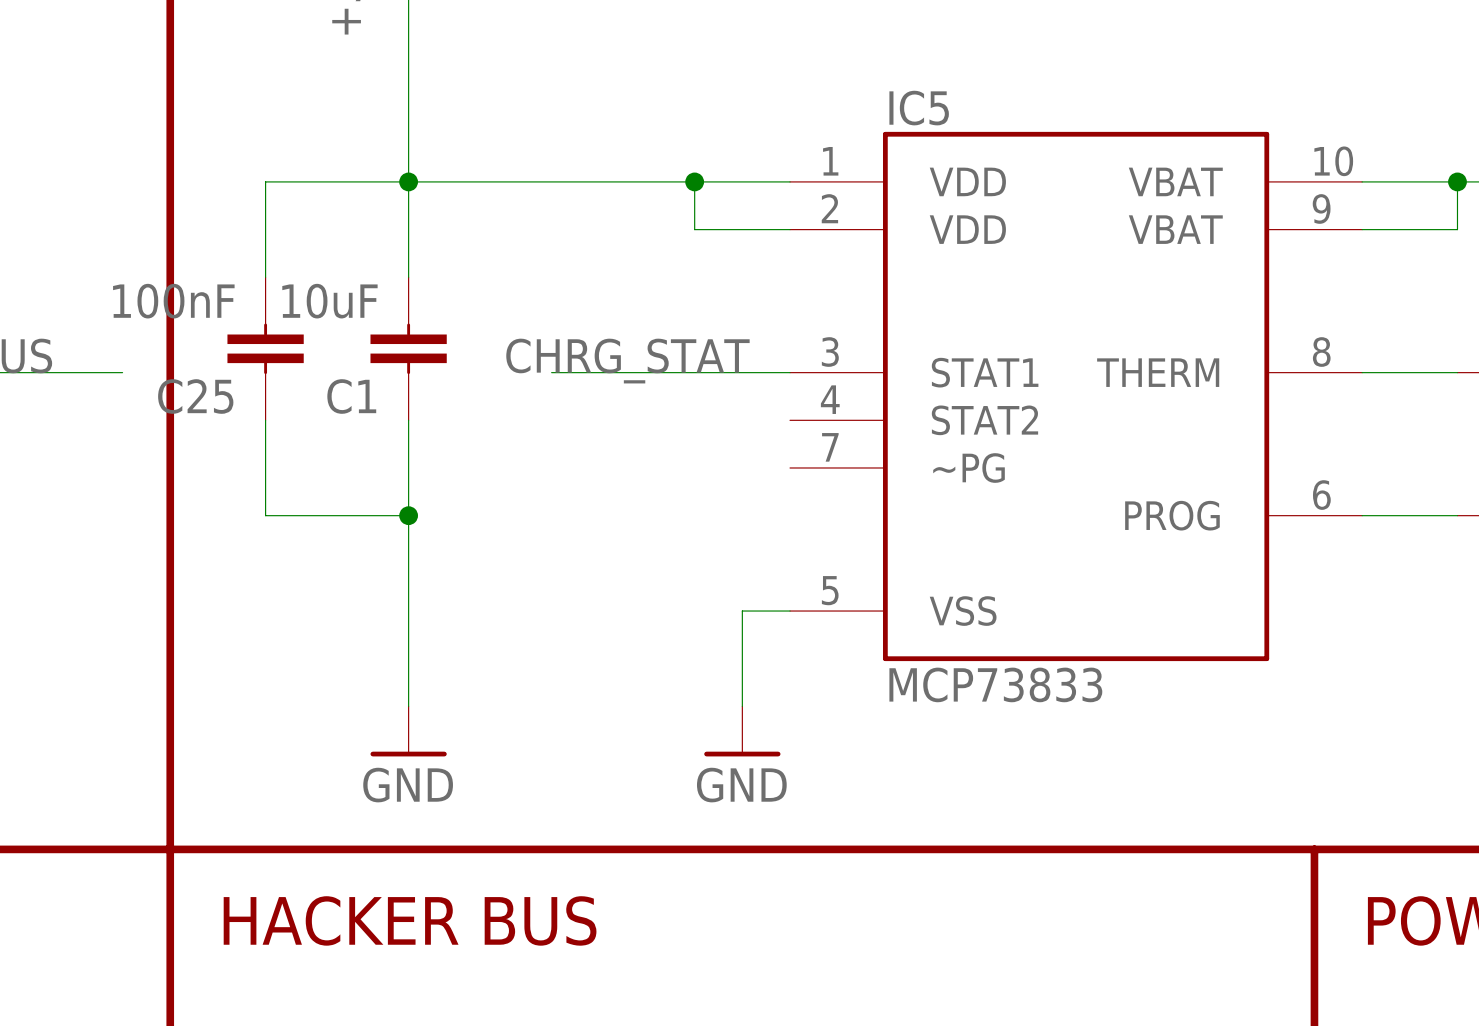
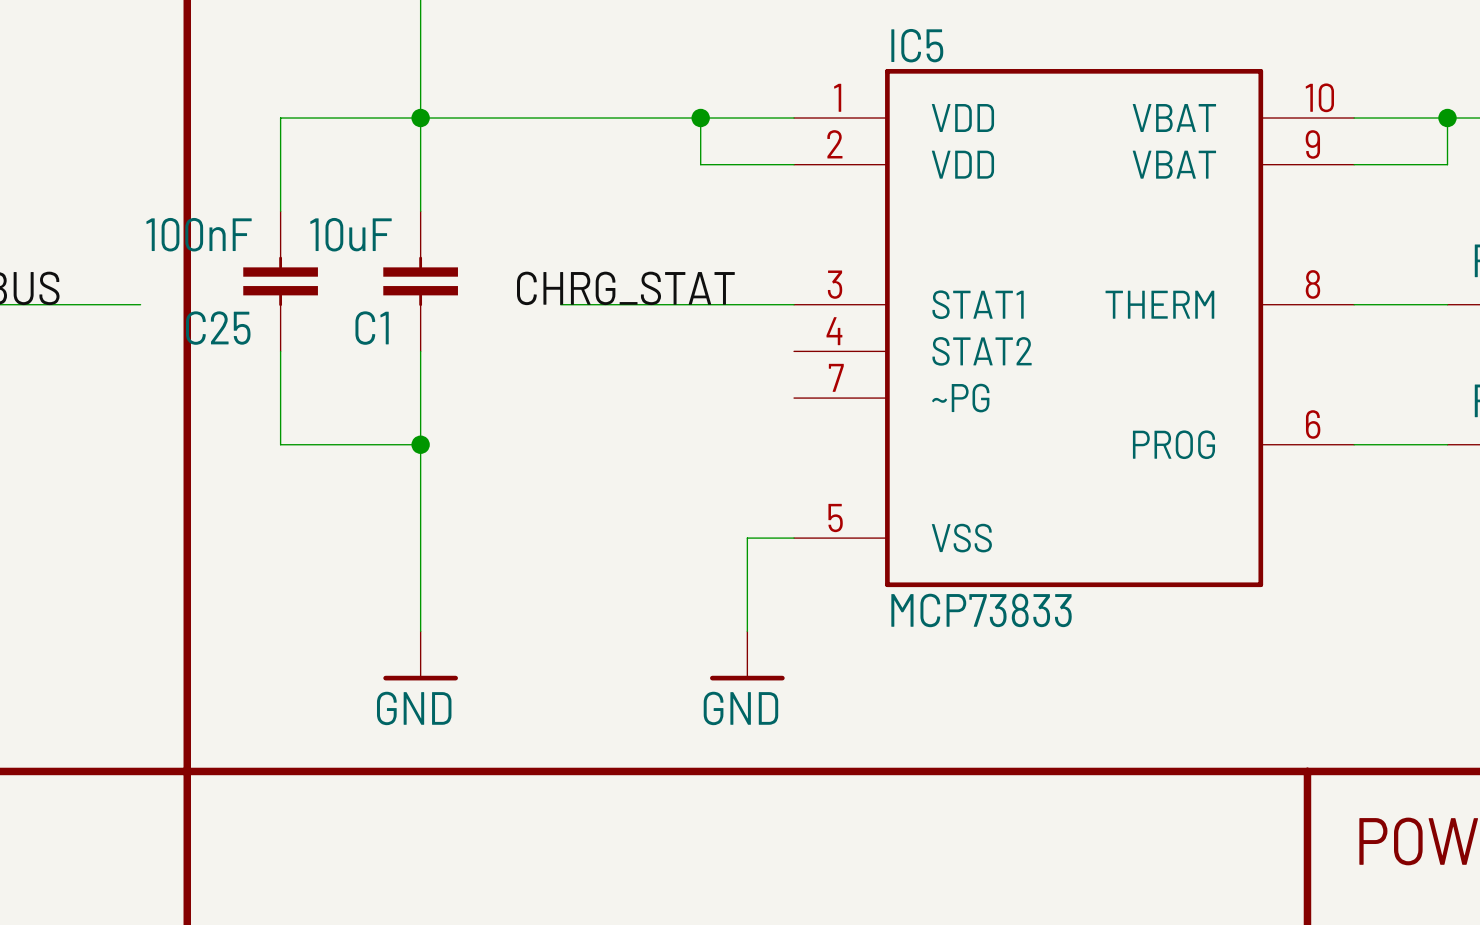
text: HACKER BUS (410, 920) -> none

